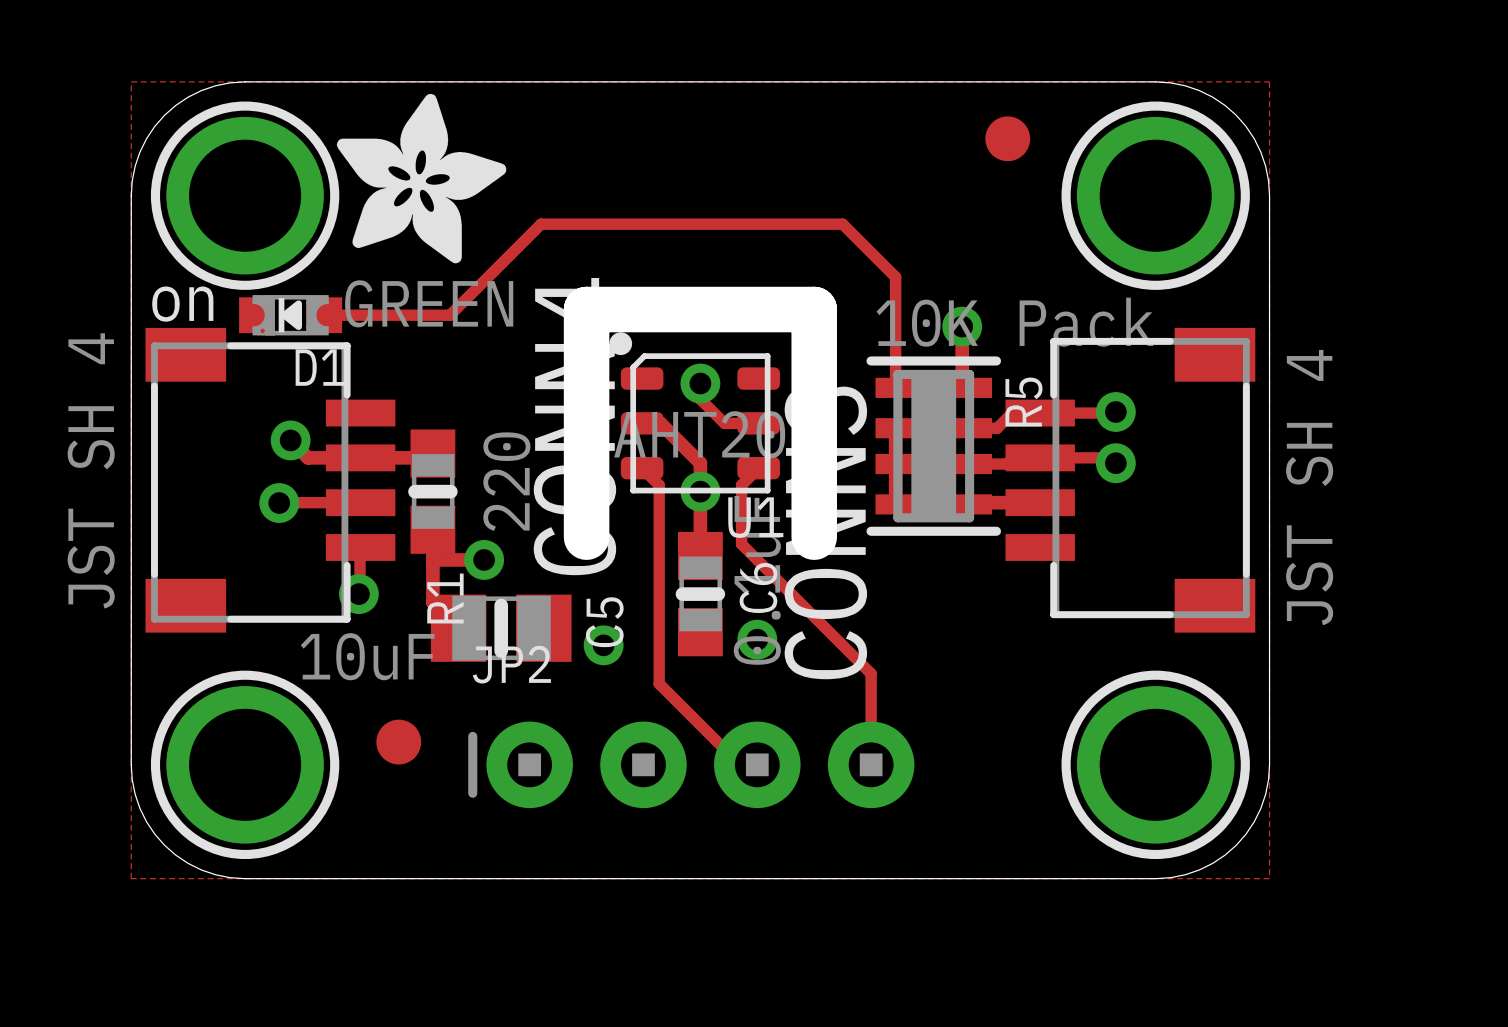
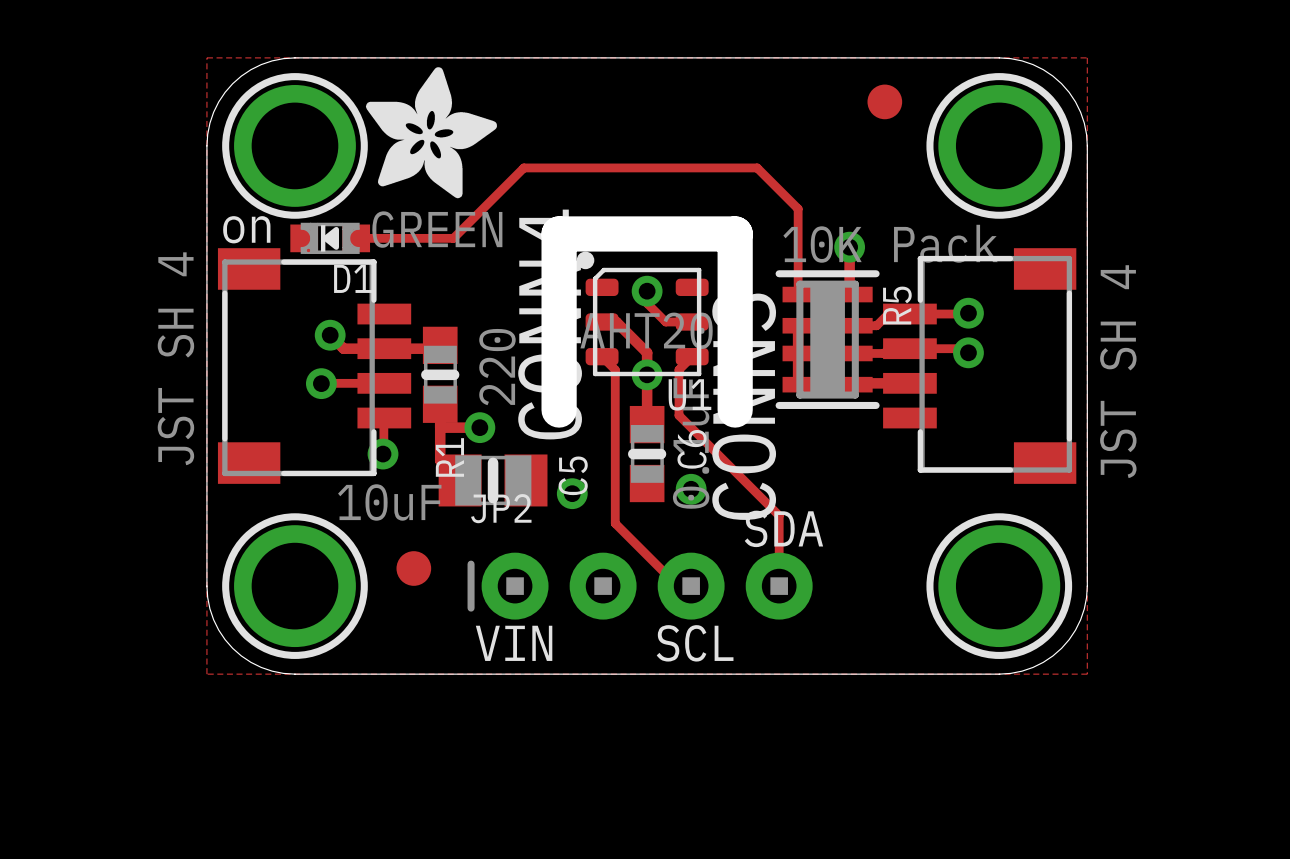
text: none -> SDA (783, 528)
text: none -> VIN (514, 643)
text: none -> SCL (695, 643)

